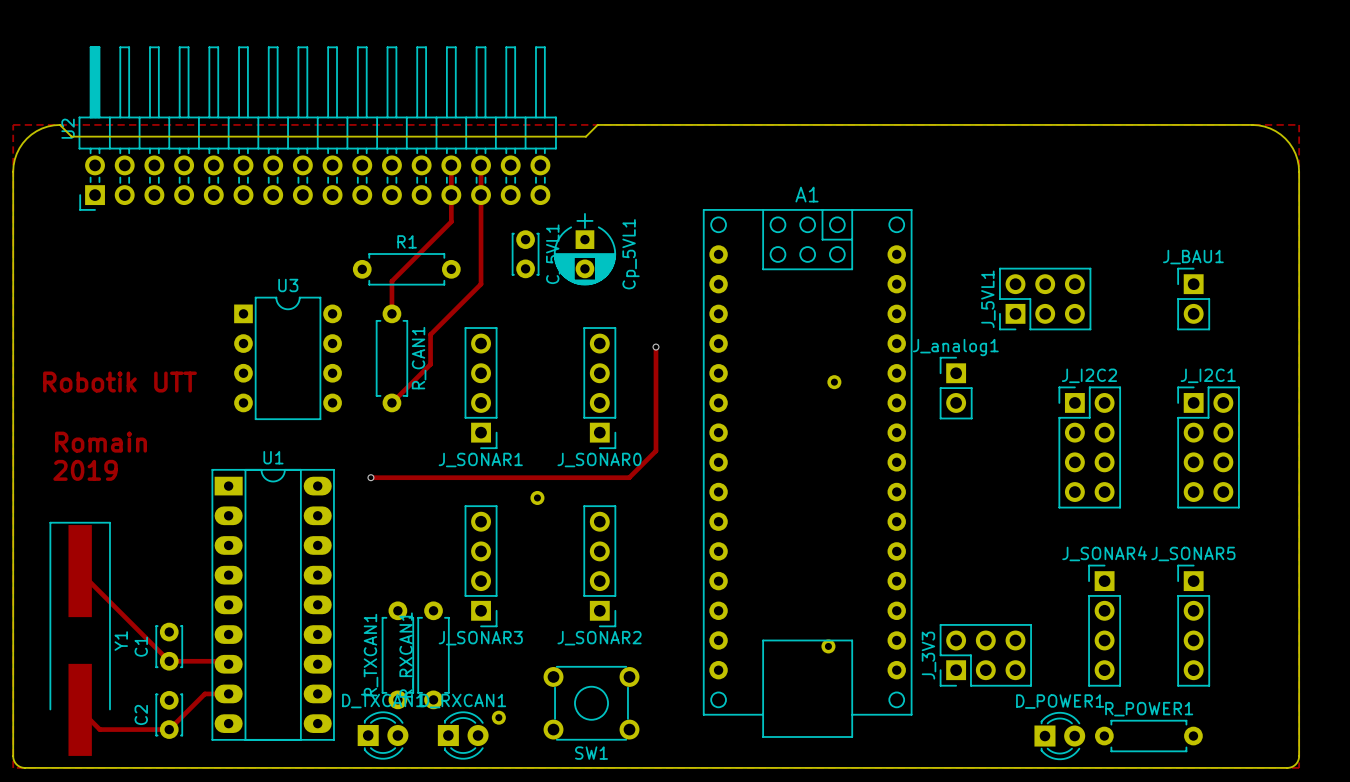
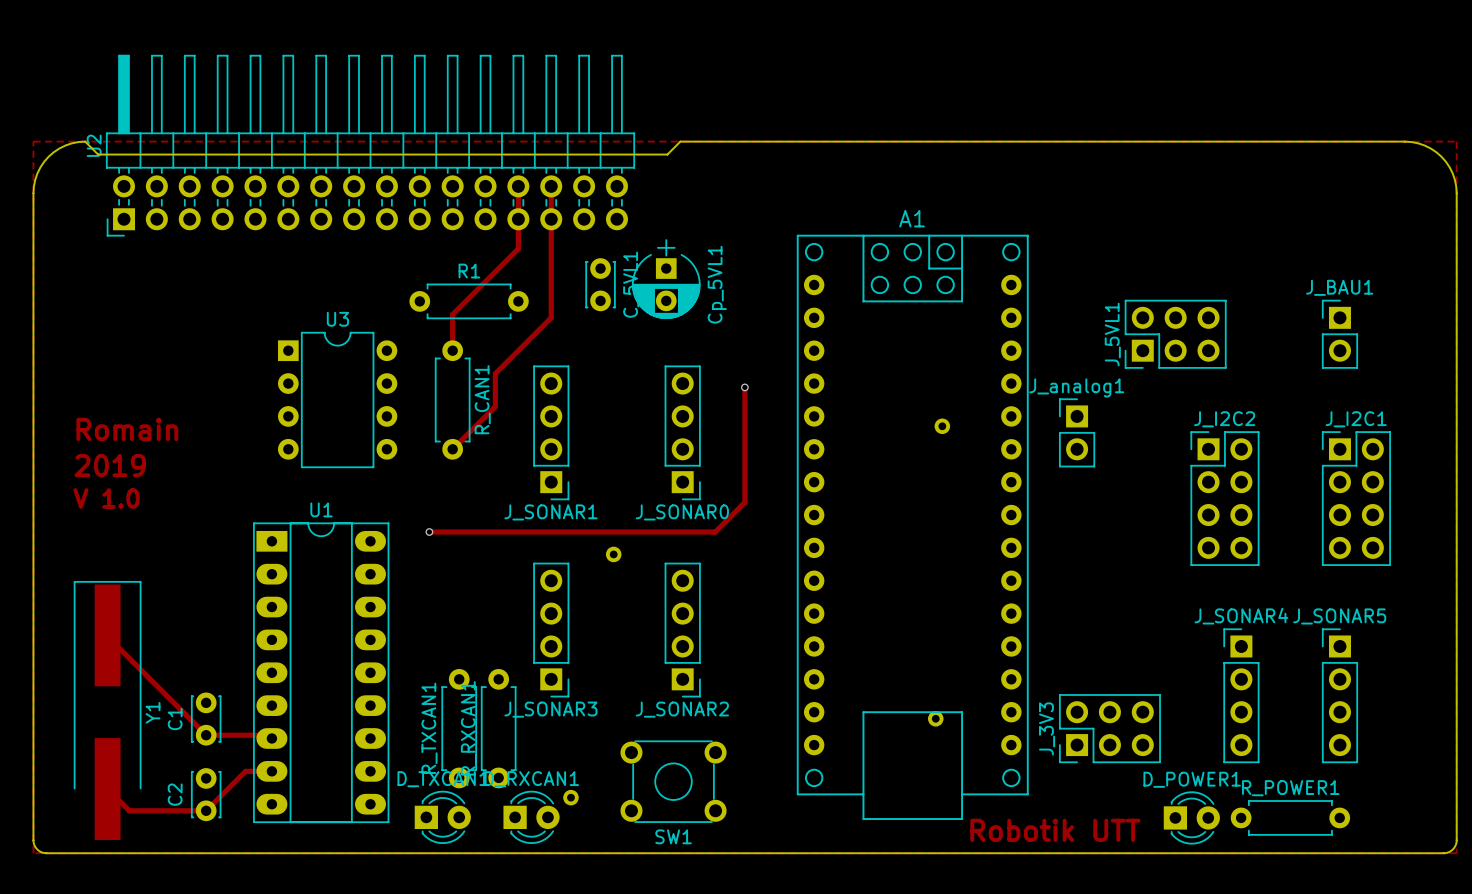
text: Robotik UTT (120, 382) -> Romain (127, 429)
text: Romain (100, 442) -> V 1.0 (106, 498)
text position: 2019 (85, 470) -> 2019 (110, 465)
text: none -> Robotik UTT (1055, 830)

